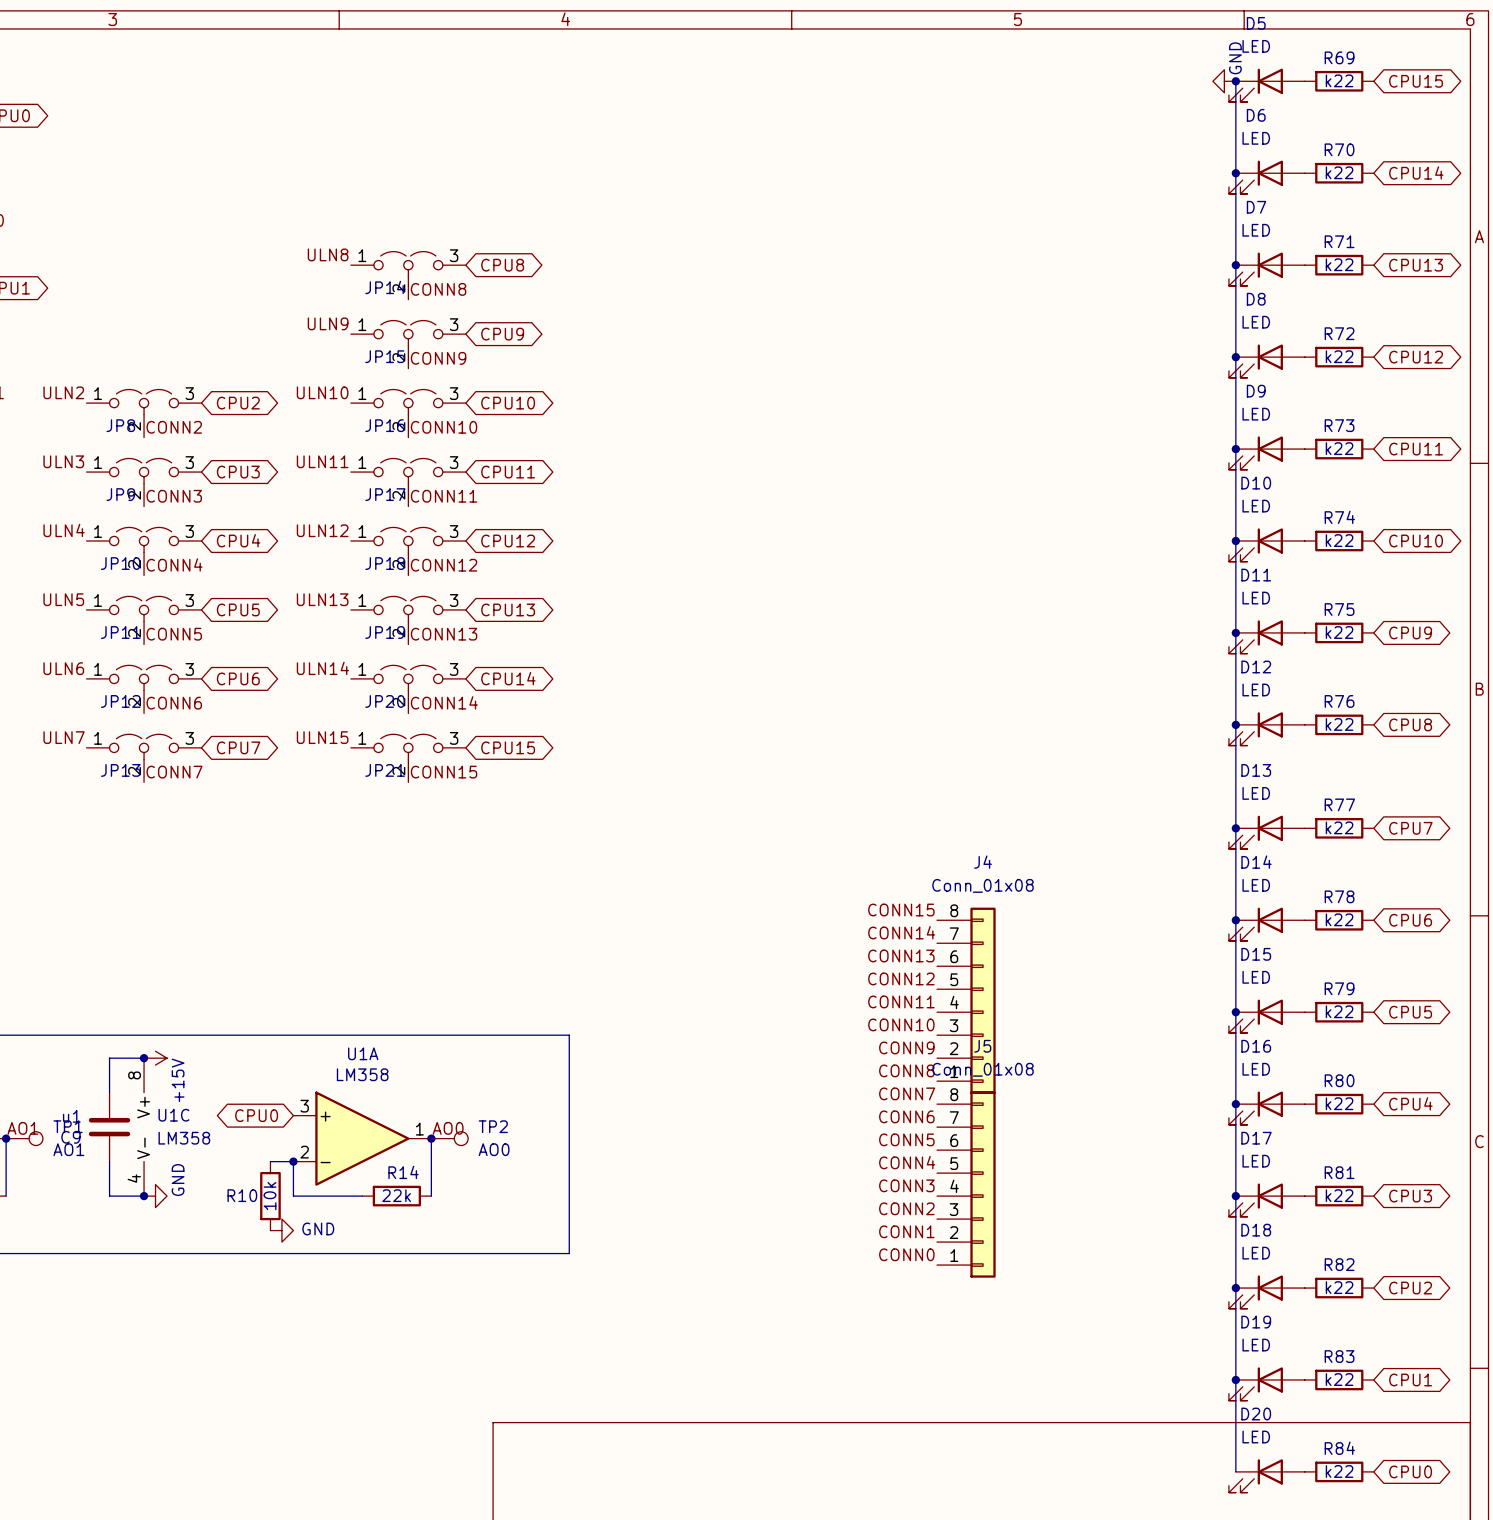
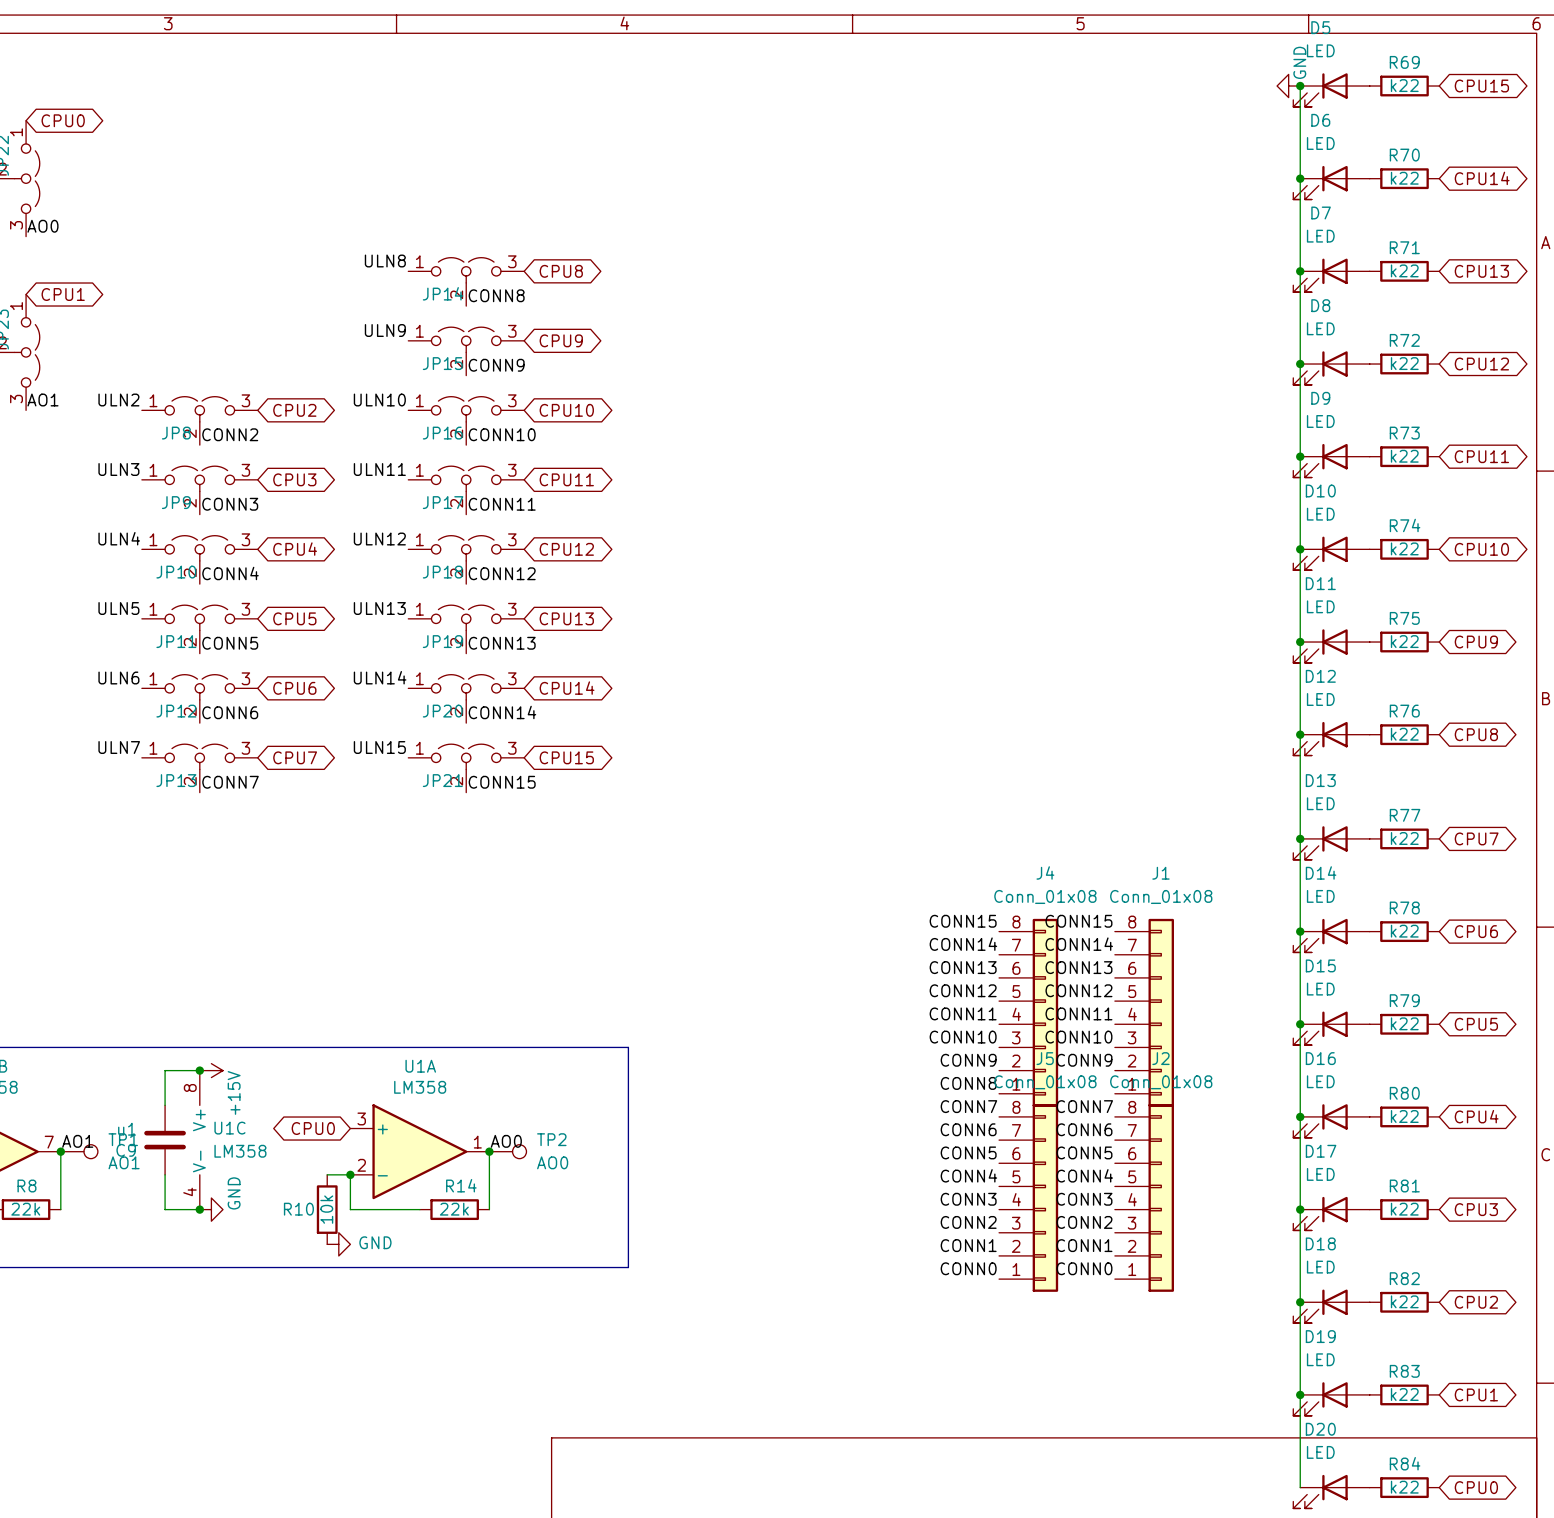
label: none -> CONN15 (1078, 921)
label: none -> CONN14 (1079, 944)
label: none -> CONN13 (1078, 967)
label: none -> CONN12 (1078, 990)
J1: none -> Conn_01x08 (1144, 1012)
label: none -> CONN11 (1078, 1013)
label: none -> CONN10 (1078, 1037)
label: none -> CONN9 (1084, 1060)
label: none -> CONN7 (1084, 1106)
label: none -> CONN6 (1084, 1129)
label: none -> CONN5 (1084, 1152)
label: none -> CONN4 (1084, 1175)
J2: none -> Conn_01x08 (1144, 1198)
label: none -> CONN3 (1084, 1199)
label: none -> CONN2 (1084, 1222)
label: none -> CONN1 (1084, 1245)
label: none -> CONN0 (1084, 1268)

